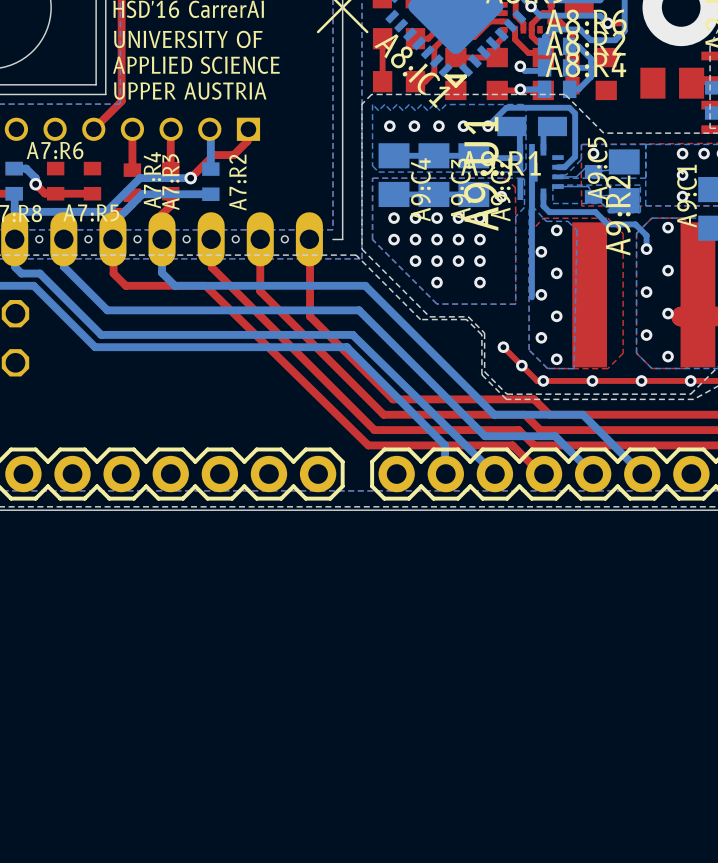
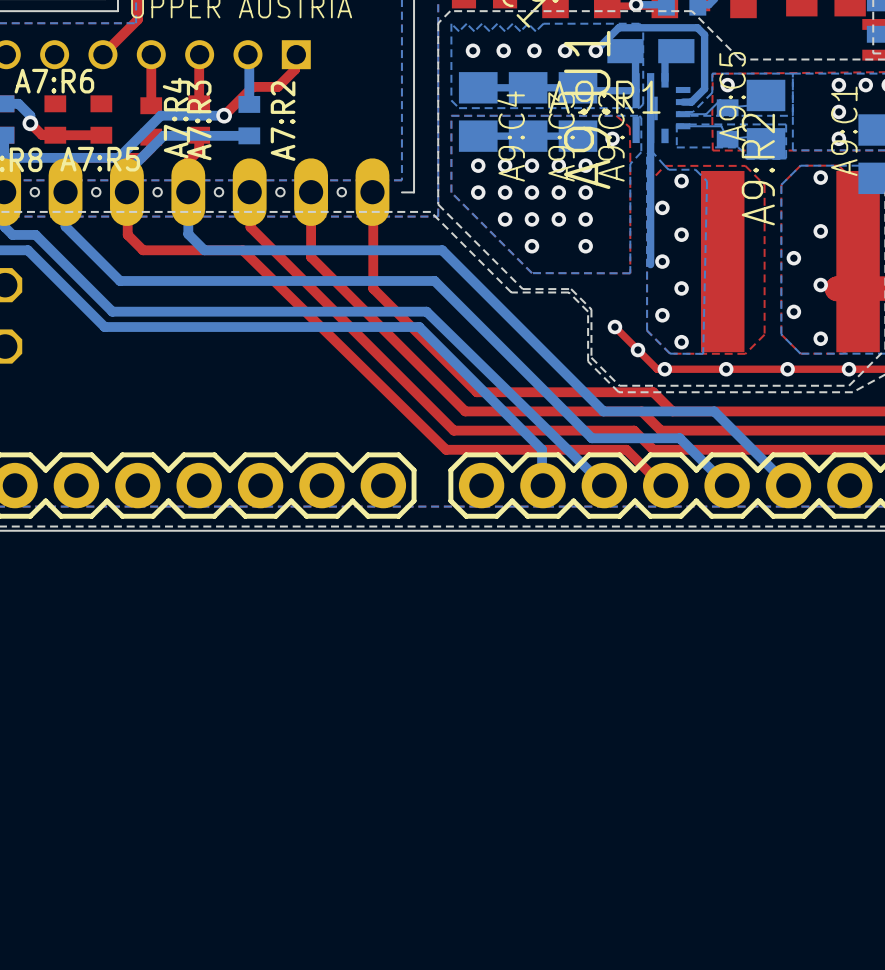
bottom track: (543, 194) (543, 206) (549, 212) (595, 212) (607, 224) (635, 224) (646, 235) (646, 249) -> none
via: (646, 249) -> none

